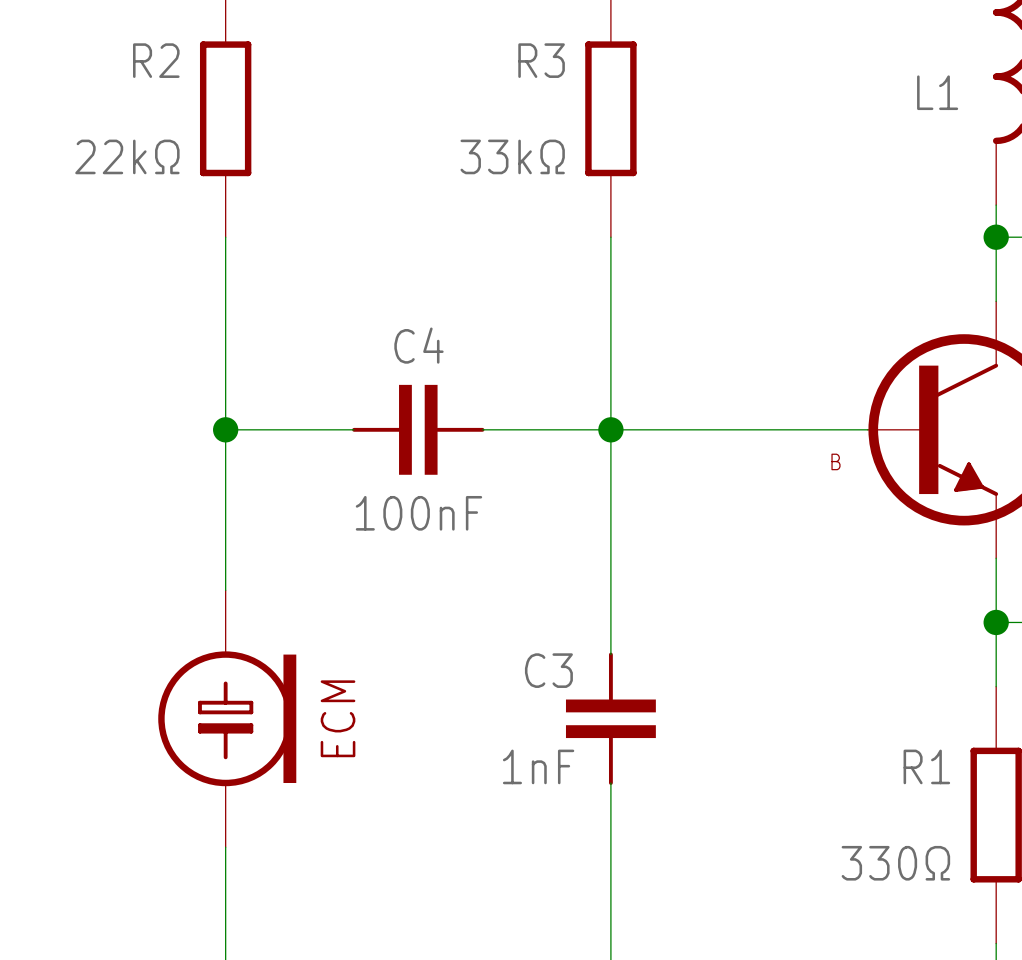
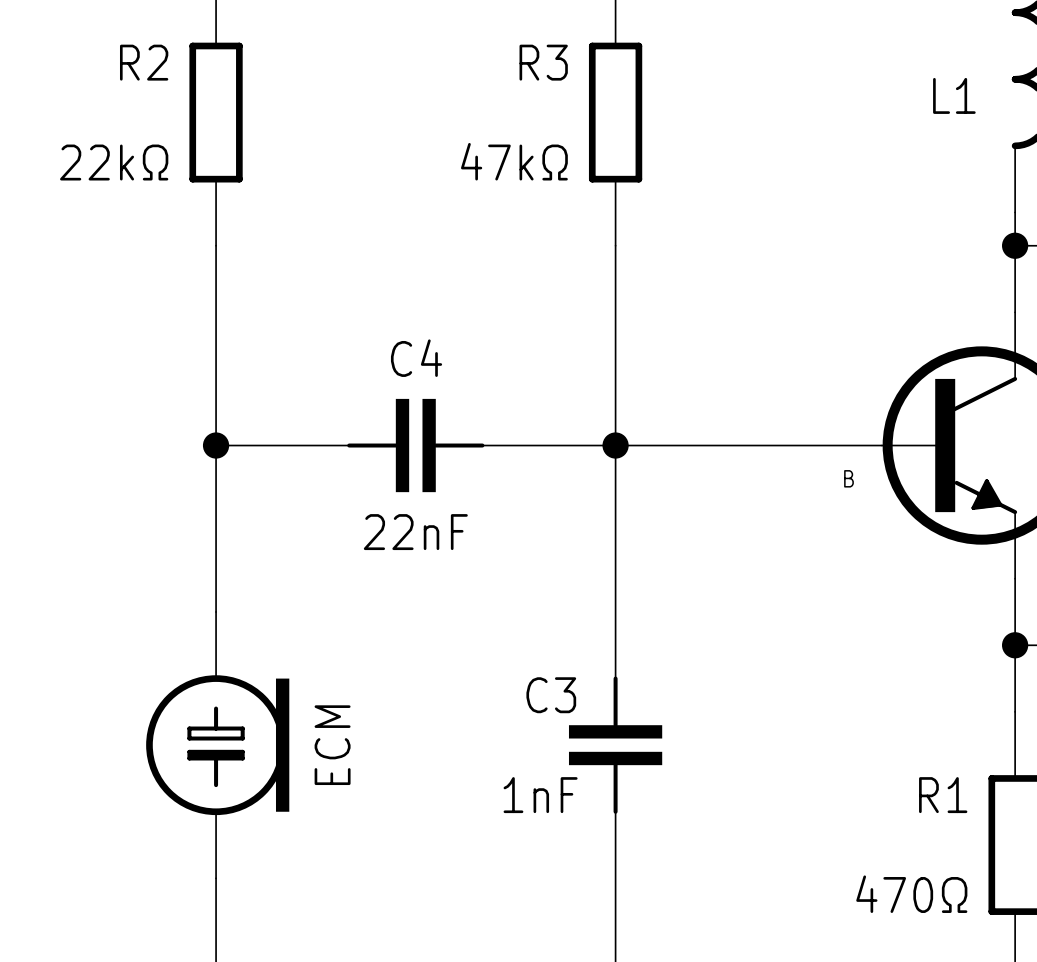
R3 value: 33kΩ (512, 156) -> 47kΩ (514, 161)
C4 value: 100nF (418, 513) -> 22nF (415, 532)
R1 value: 330Ω (895, 863) -> 470Ω (911, 894)

